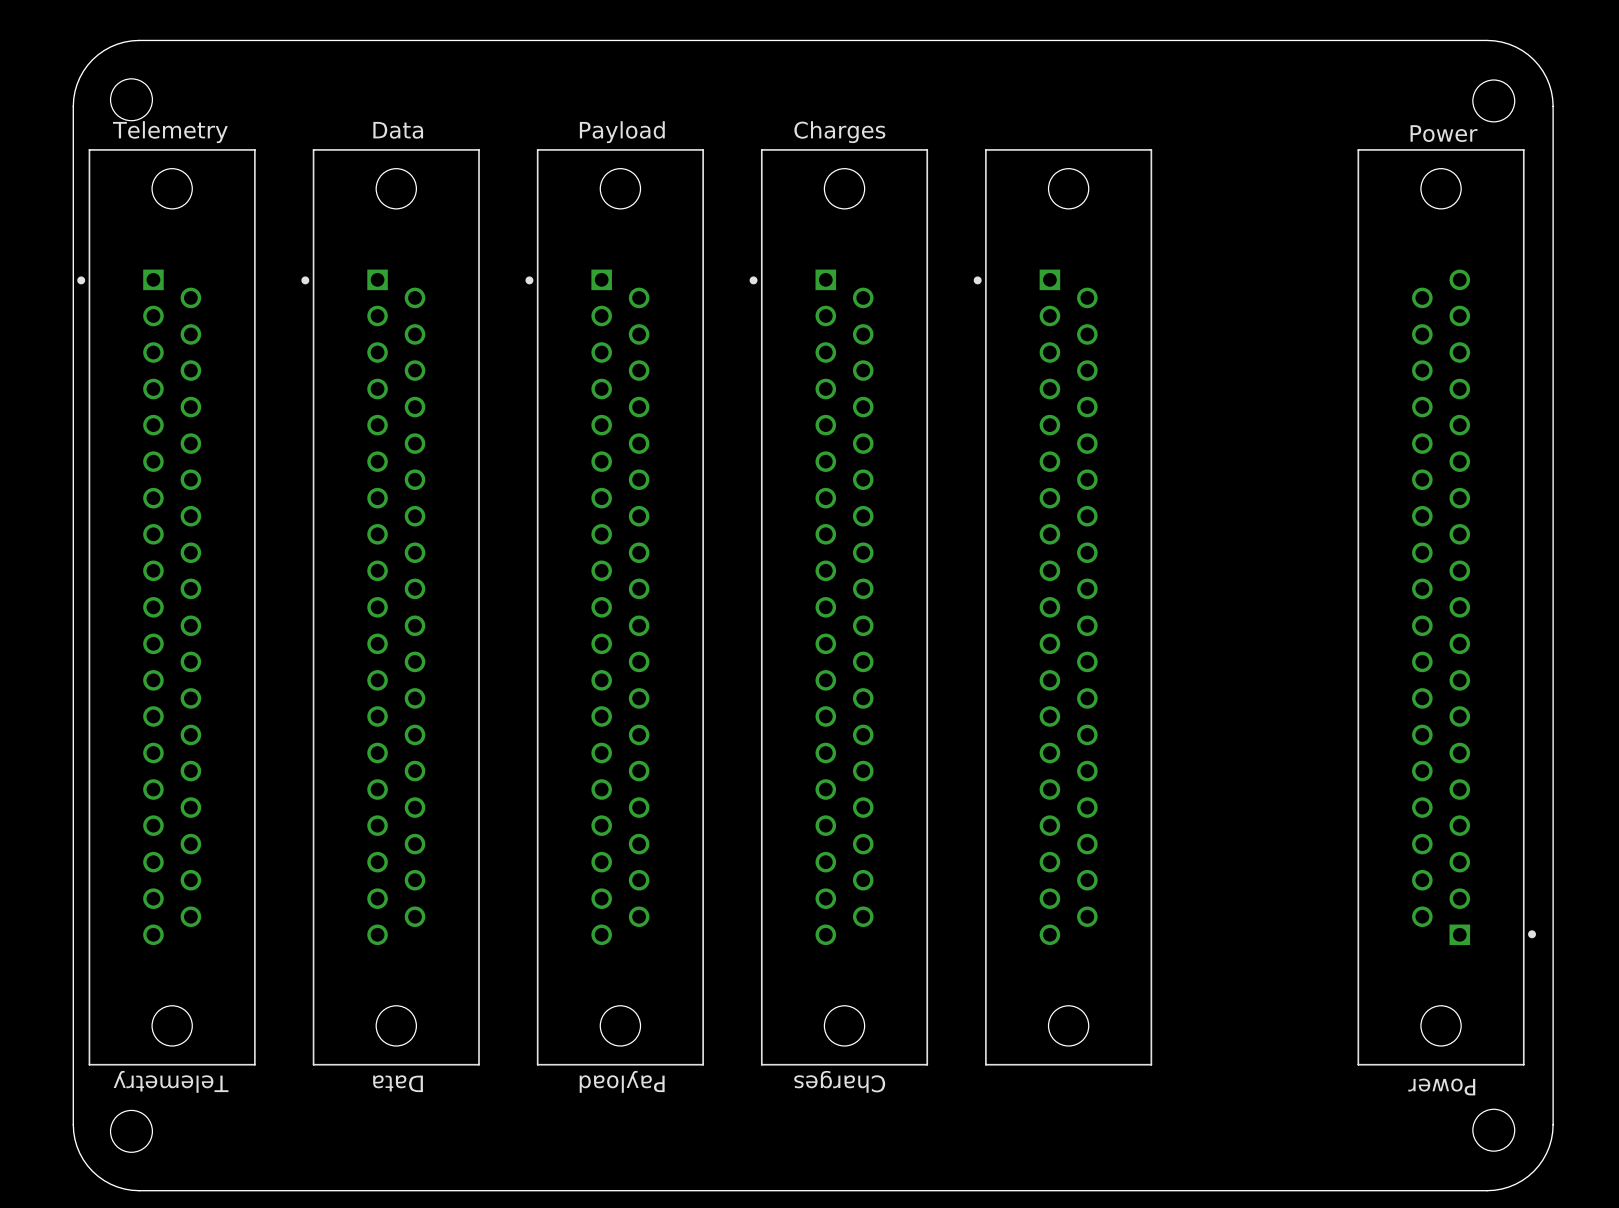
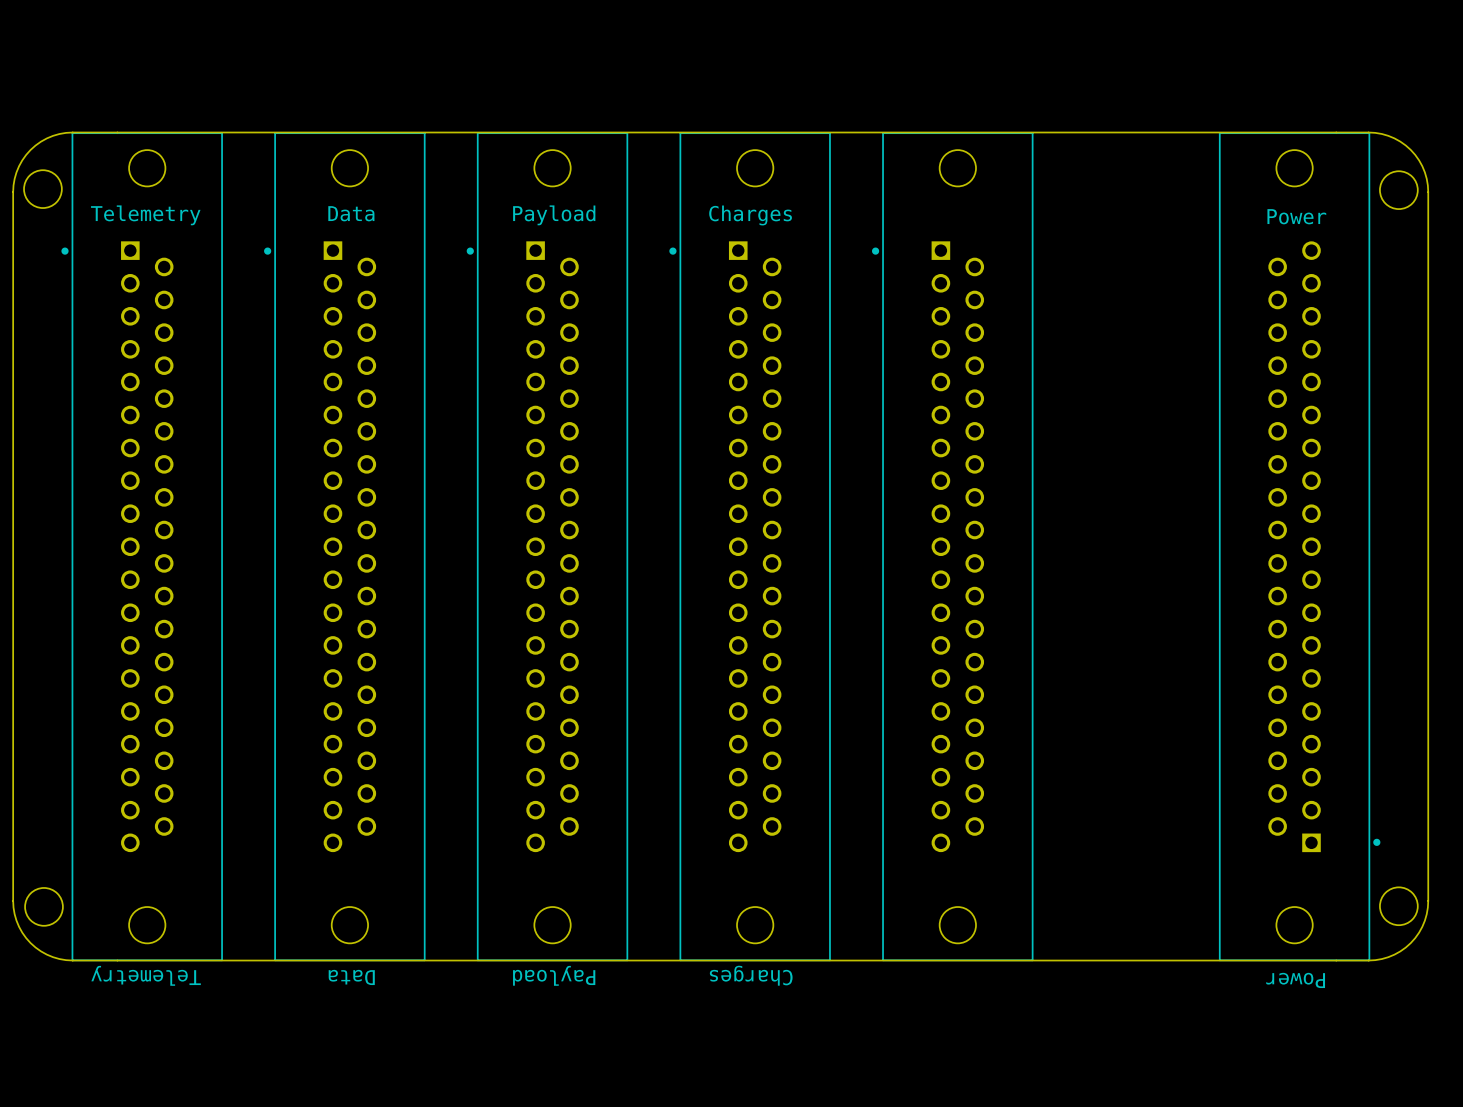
board edge: (139, 40) (1487, 40) (1508, 44) (1528, 54) (1538, 65) (1546, 77) (1551, 91) (1553, 106) (1553, 1124) (1549, 1146) (1538, 1165) (1528, 1176) (1515, 1184) (1501, 1189) (1487, 1190) (139, 1190) (117, 1186) (98, 1176) (87, 1165) (79, 1153) (74, 1139) (73, 1124) (73, 106) (76, 84) (83, 71) (92, 59) (110, 46) (124, 42) (139, 40) -> (72, 132) (46, 138) (30, 149) (16, 172) (13, 192) (13, 900) (16, 920) (22, 932) (41, 951) (53, 957) (72, 960) (1368, 960) (1394, 954) (1410, 943) (1419, 932) (1426, 914) (1428, 900) (1428, 192) (1422, 166) (1415, 154) (1400, 141) (1388, 135) (1368, 132) (72, 132)
round board edge position: (131, 99) -> (42, 189)
round board edge position: (1493, 100) -> (1398, 190)
text position: Data (398, 130) -> Data (351, 213)
text position: Telemetry (170, 132) -> Telemetry (145, 215)
text position: Payload (622, 132) -> Payload (554, 215)
text position: Charges (839, 132) -> Charges (750, 215)
text position: Power (1444, 133) -> Power (1296, 216)
round board edge position: (1493, 1130) -> (1398, 906)
round board edge position: (131, 1131) -> (43, 906)

